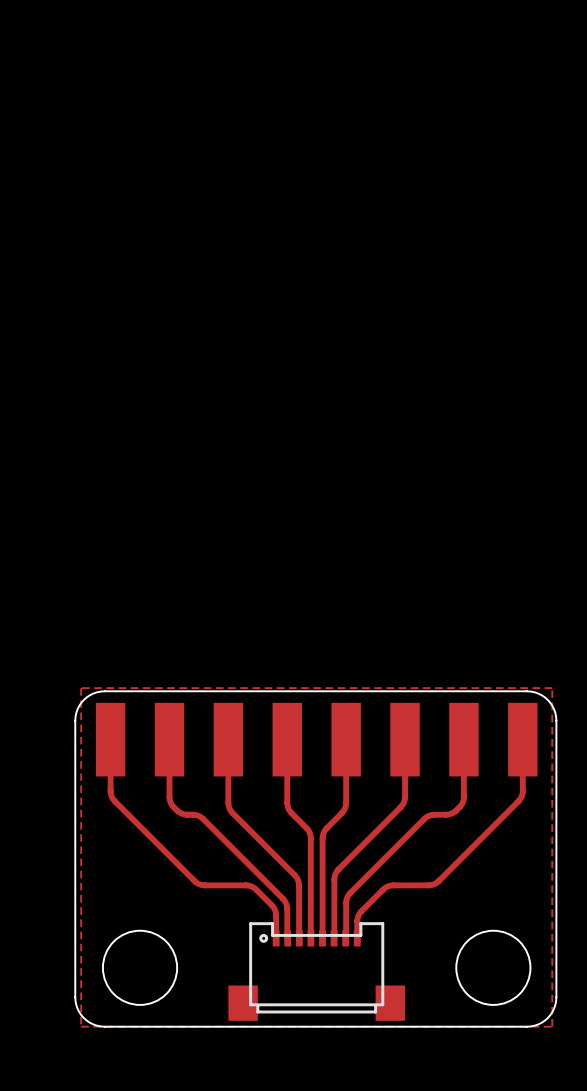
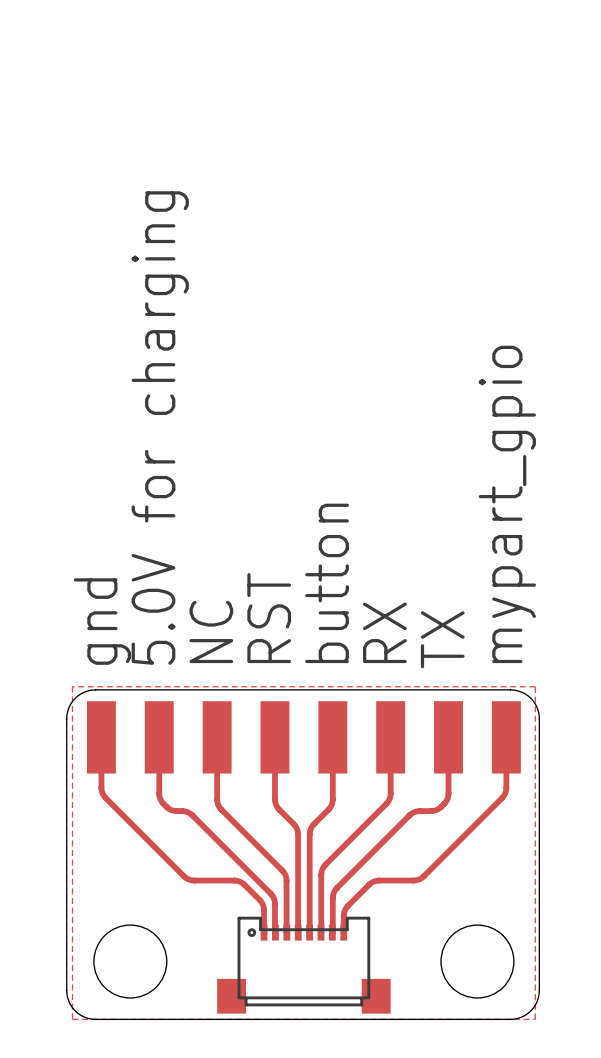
text: none -> 5.0V for charging (160, 428)
text: none -> mypart_gpio (507, 504)
text: none -> button (327, 583)
text: none -> RST (269, 618)
text: none -> gnd (102, 621)
text: none -> NC (211, 631)
text: none -> RX (384, 632)
text: none -> TX (442, 639)

